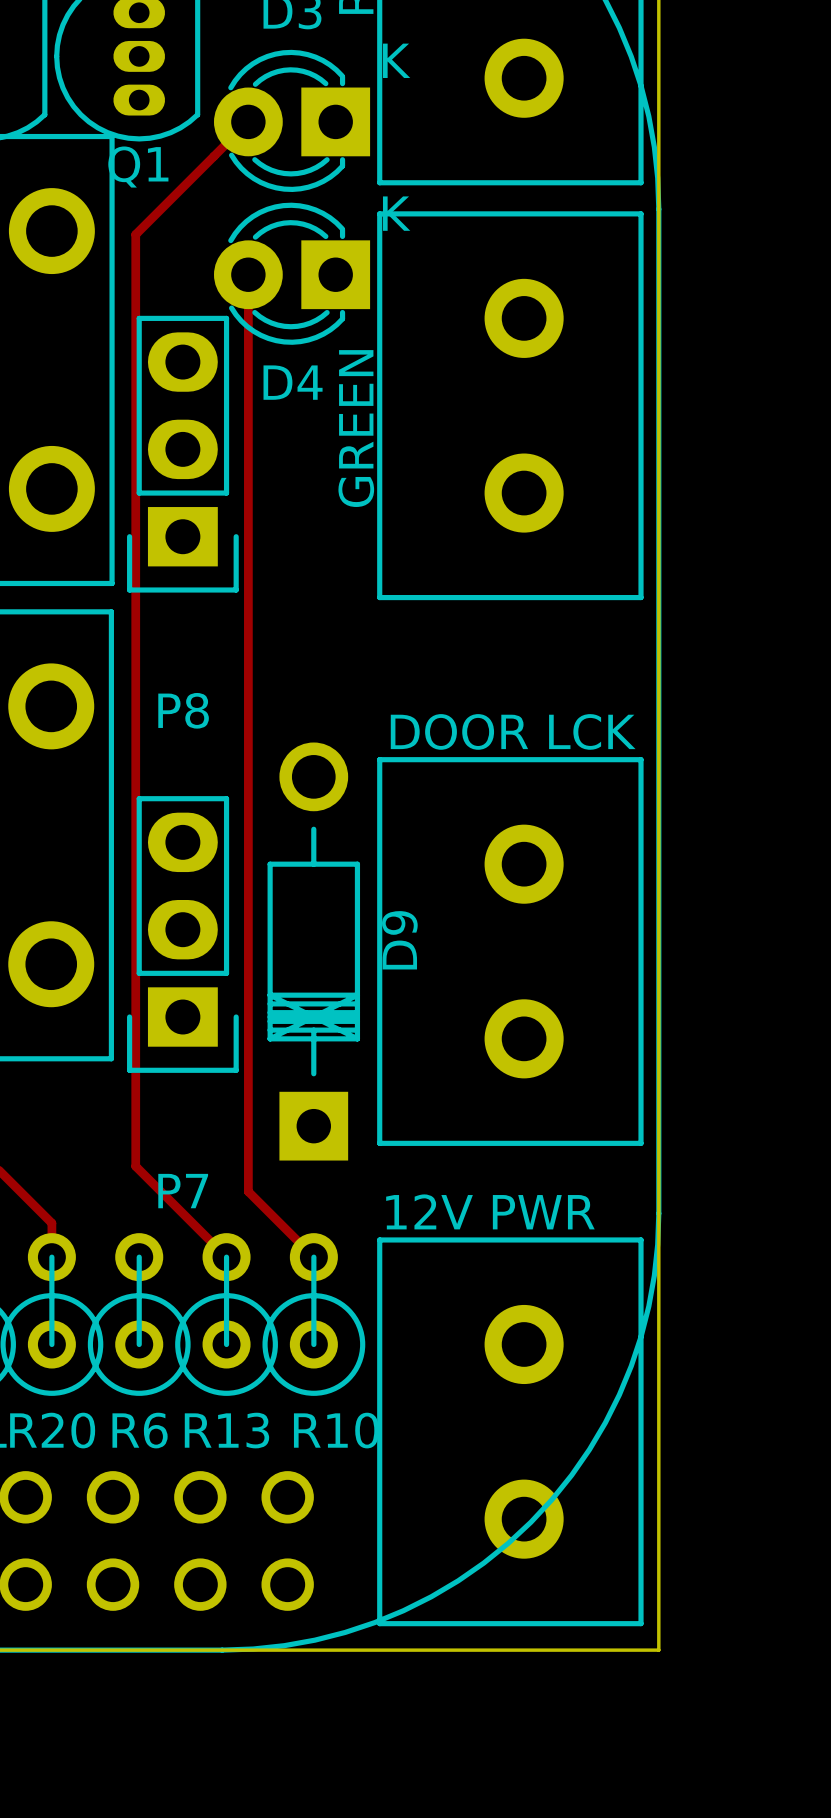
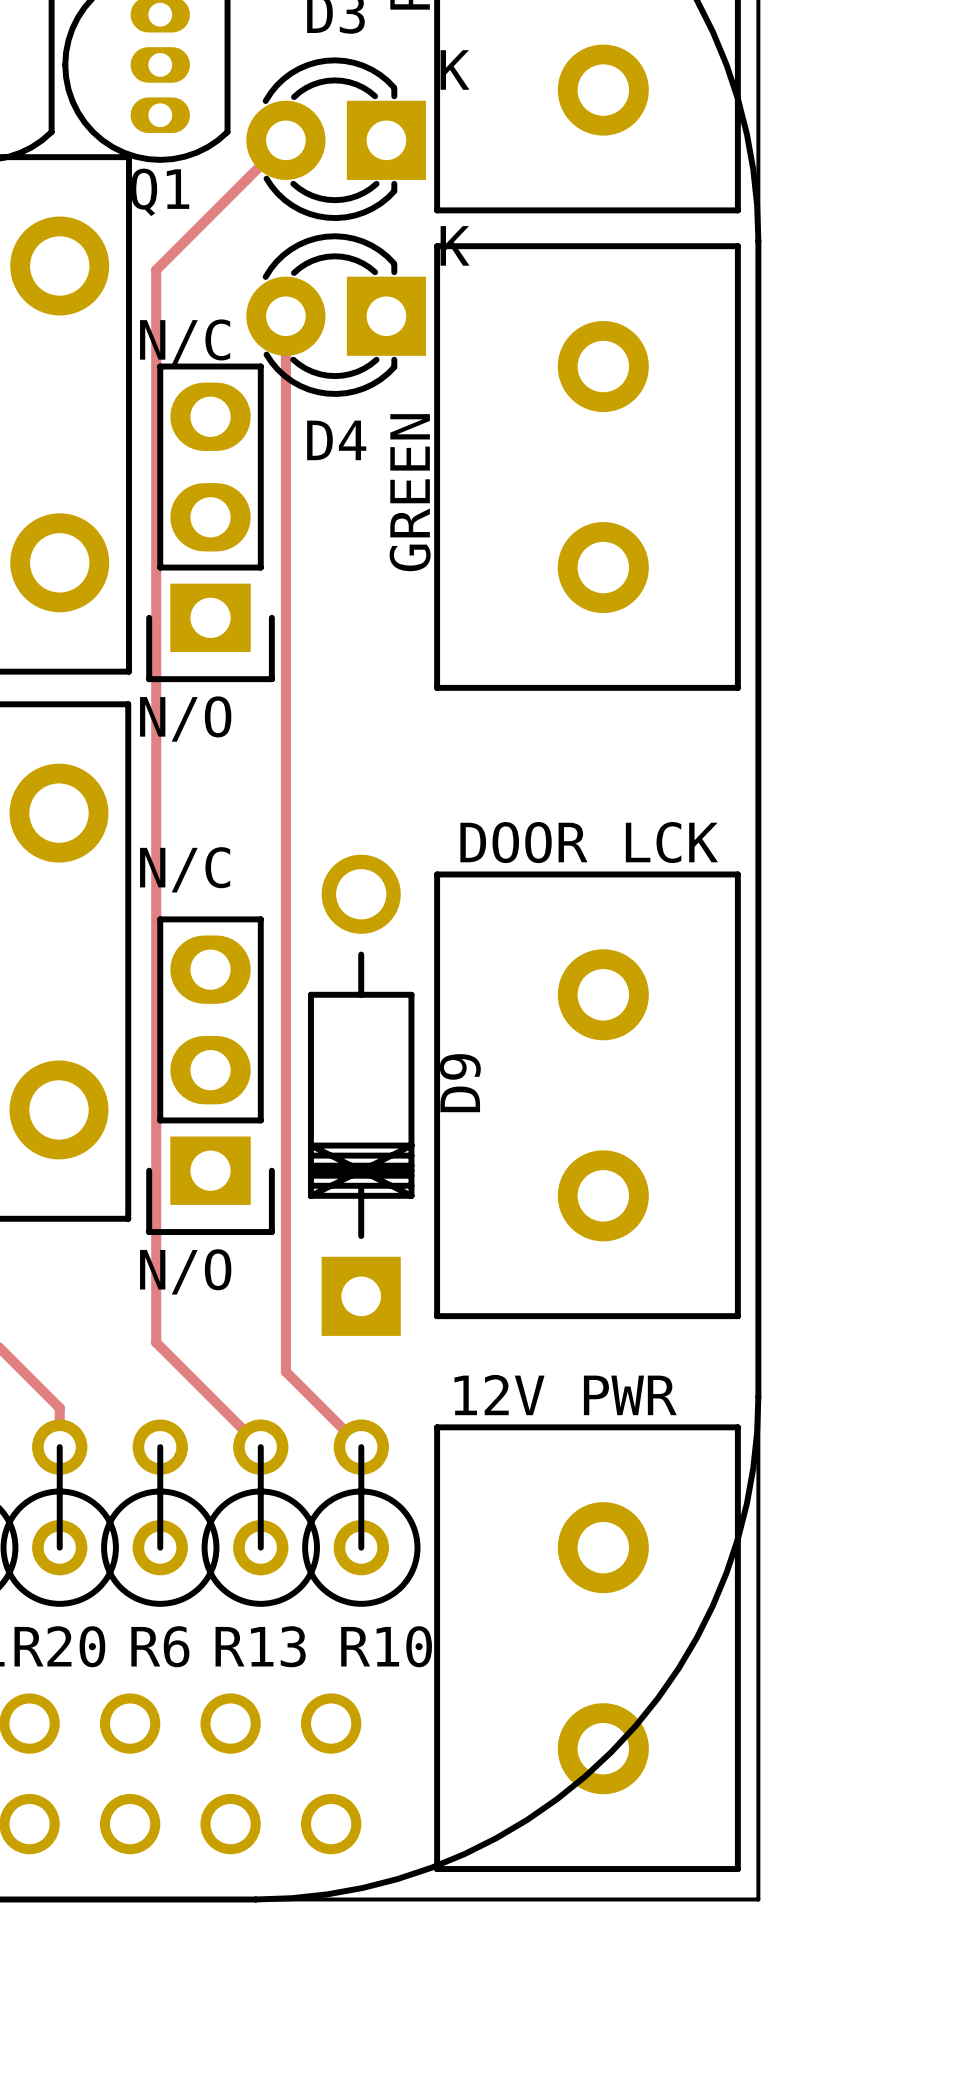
text: none -> N/C (185, 342)
P8 name: P8 (183, 710) -> N/O (185, 719)
text: none -> N/C (185, 869)
P7 name: P7 (183, 1191) -> N/O (185, 1271)

